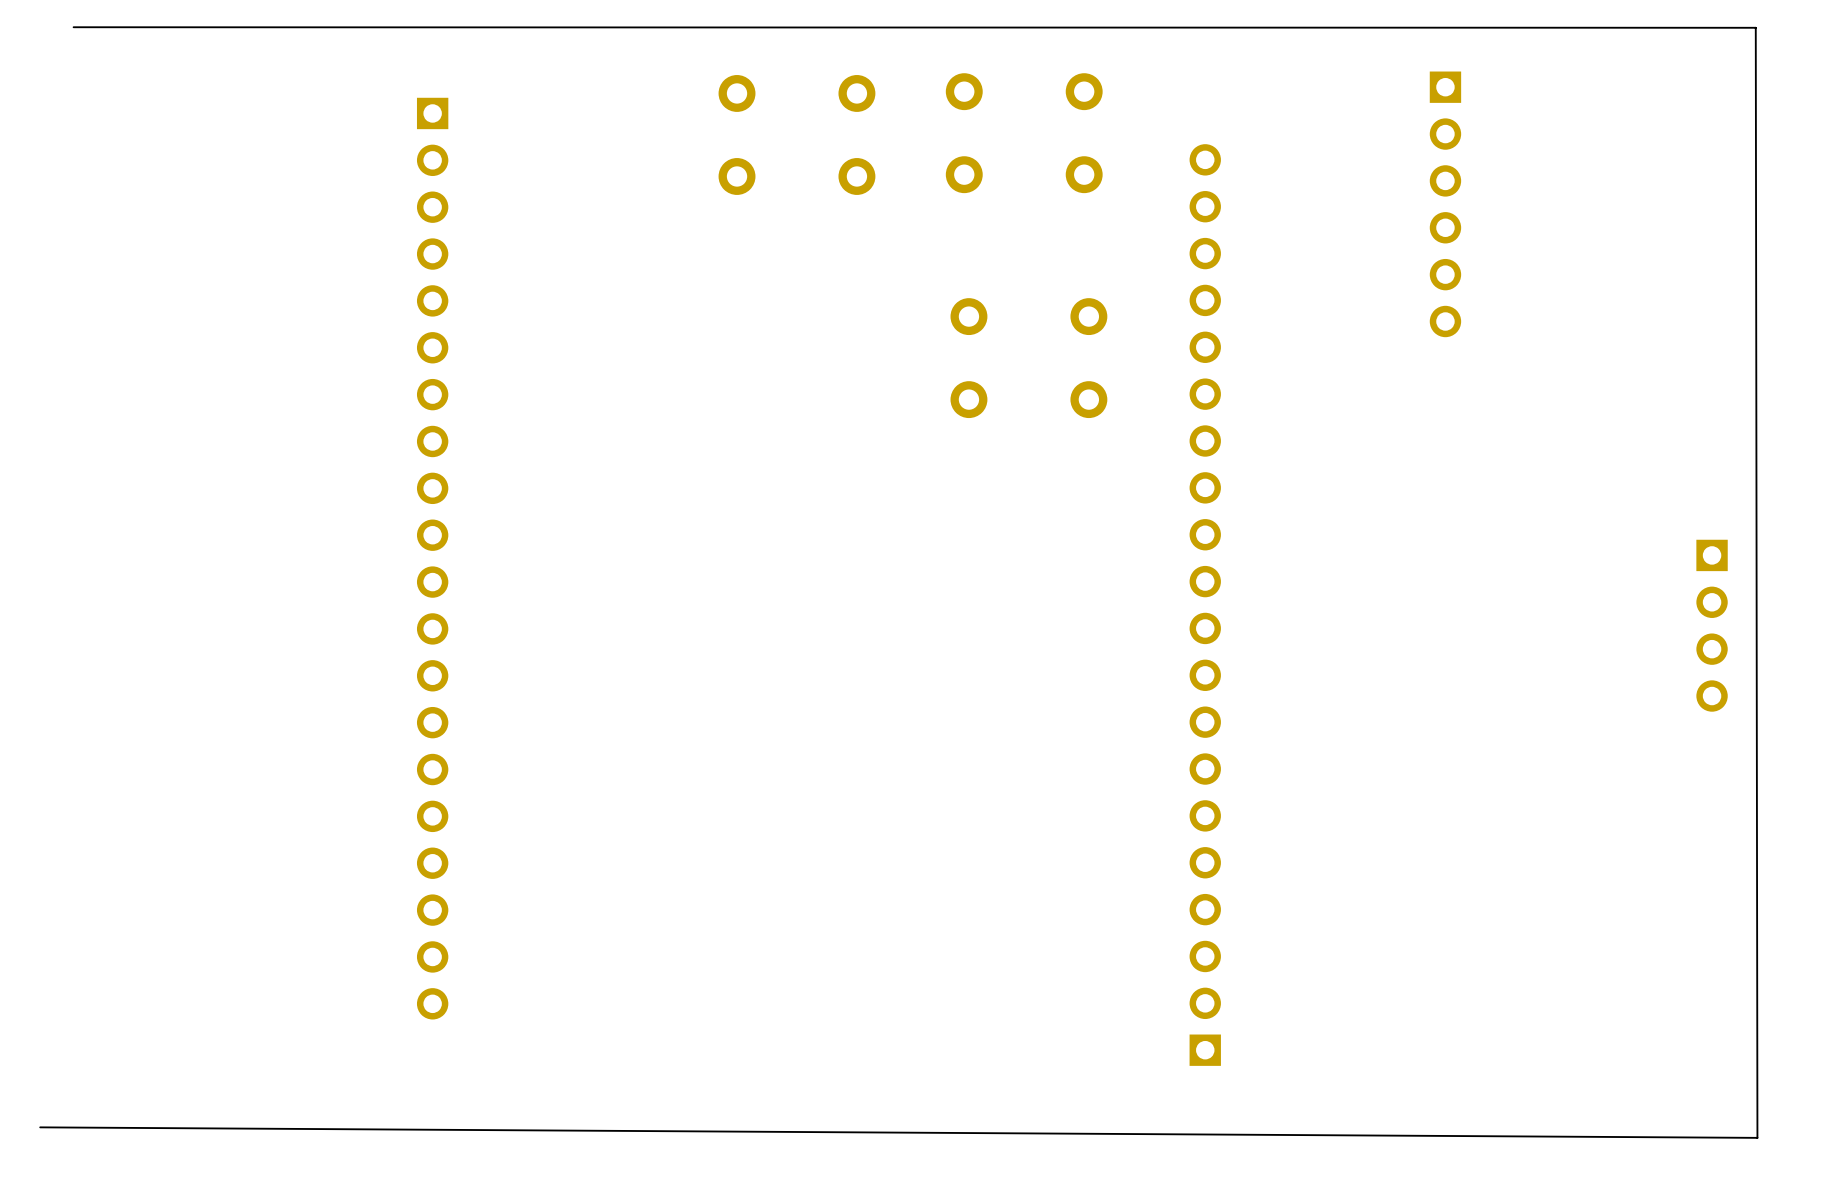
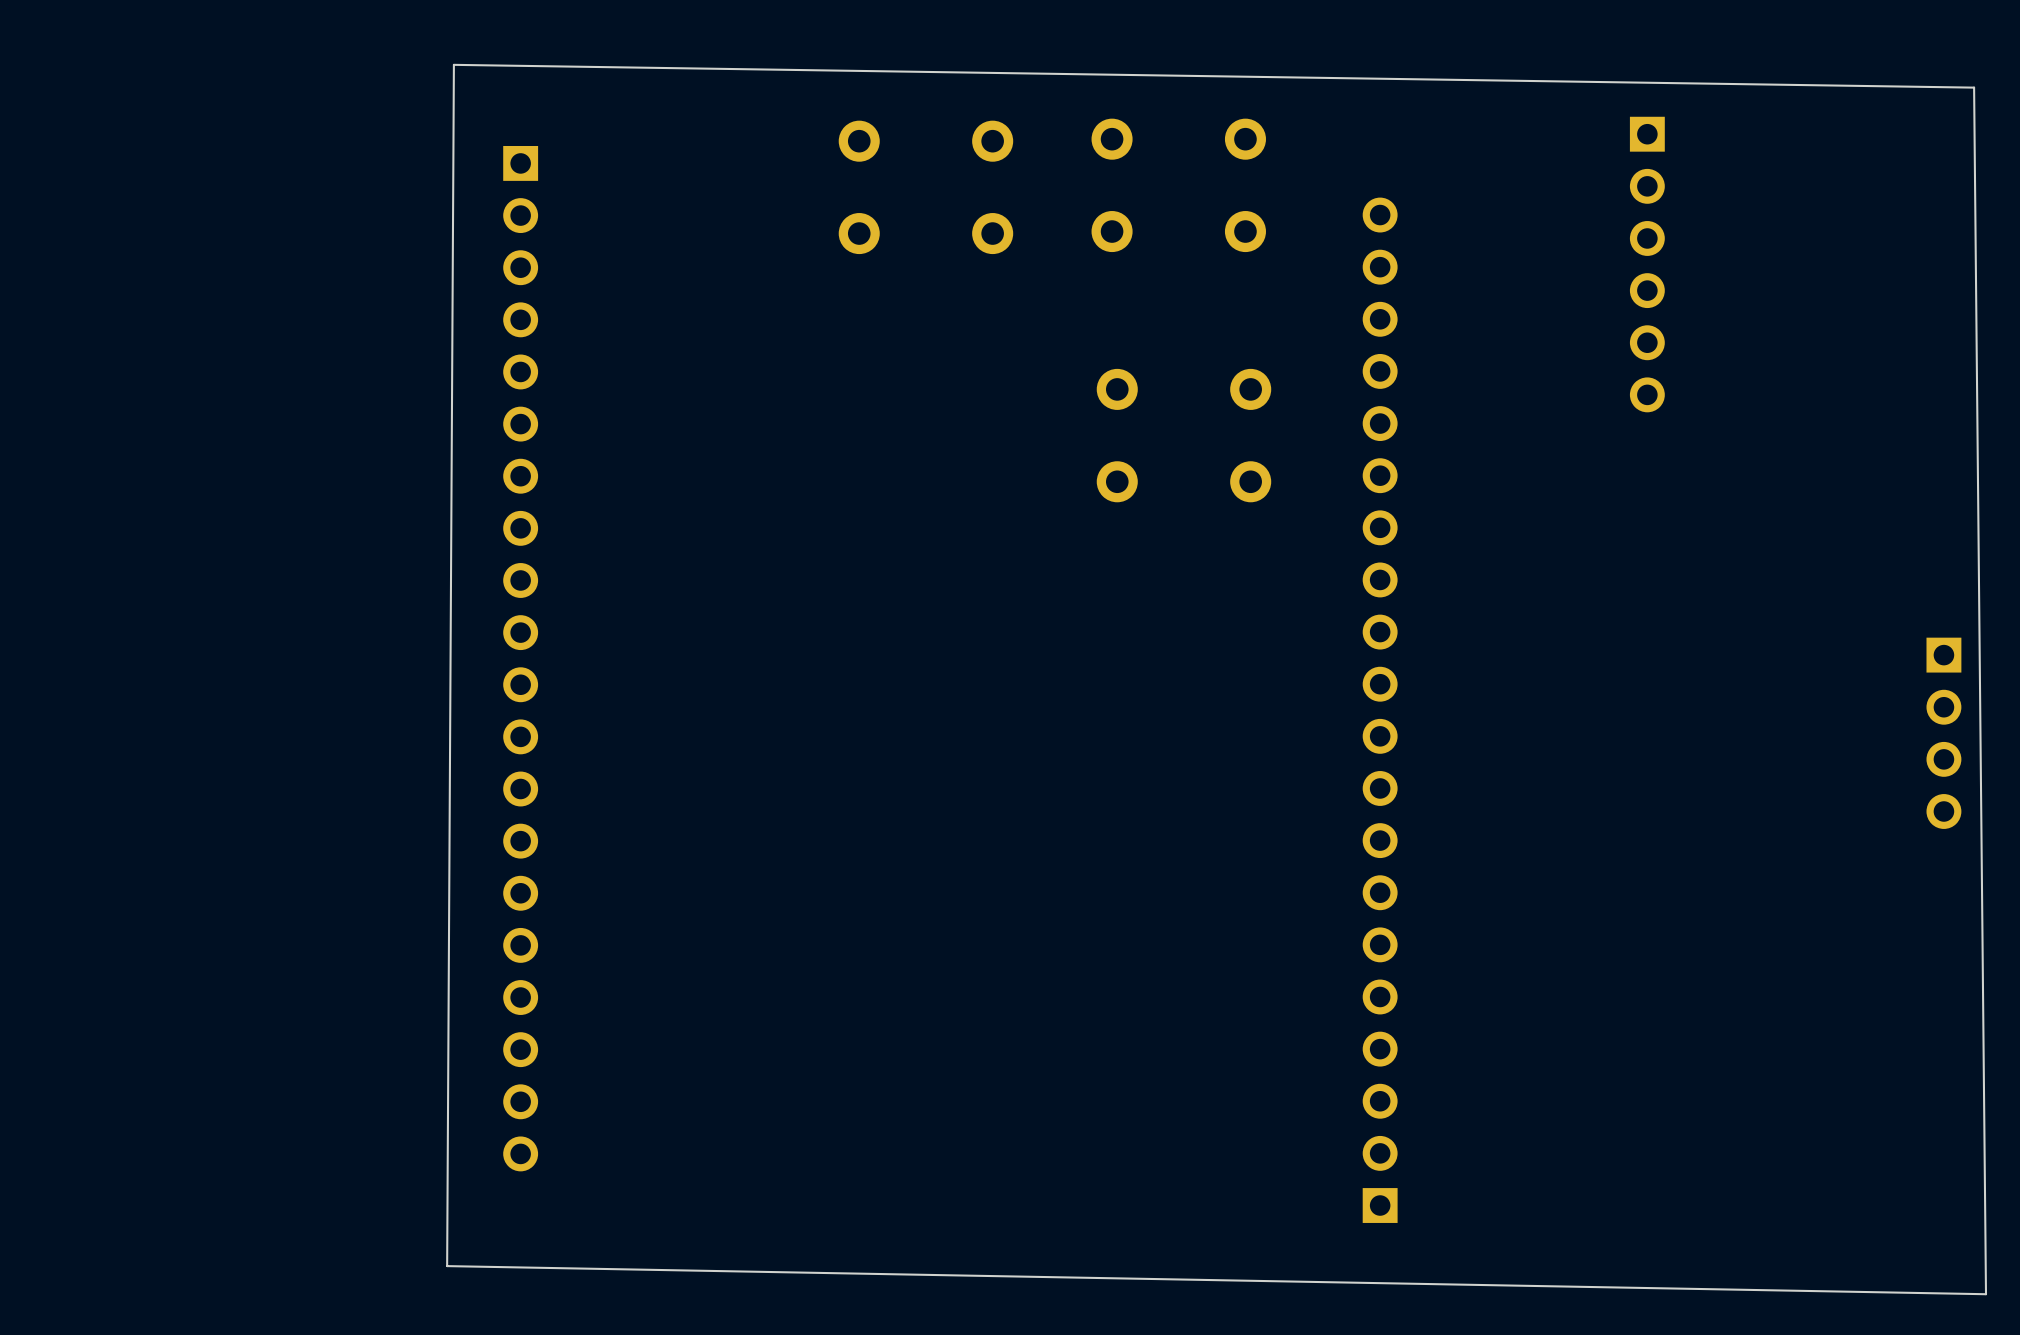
board edge: none -> (453, 64) (447, 1266) (1986, 1294) (1974, 87) (453, 64)
board edge: (73, 27) (1755, 27) (1757, 1137) (40, 1127) -> none

